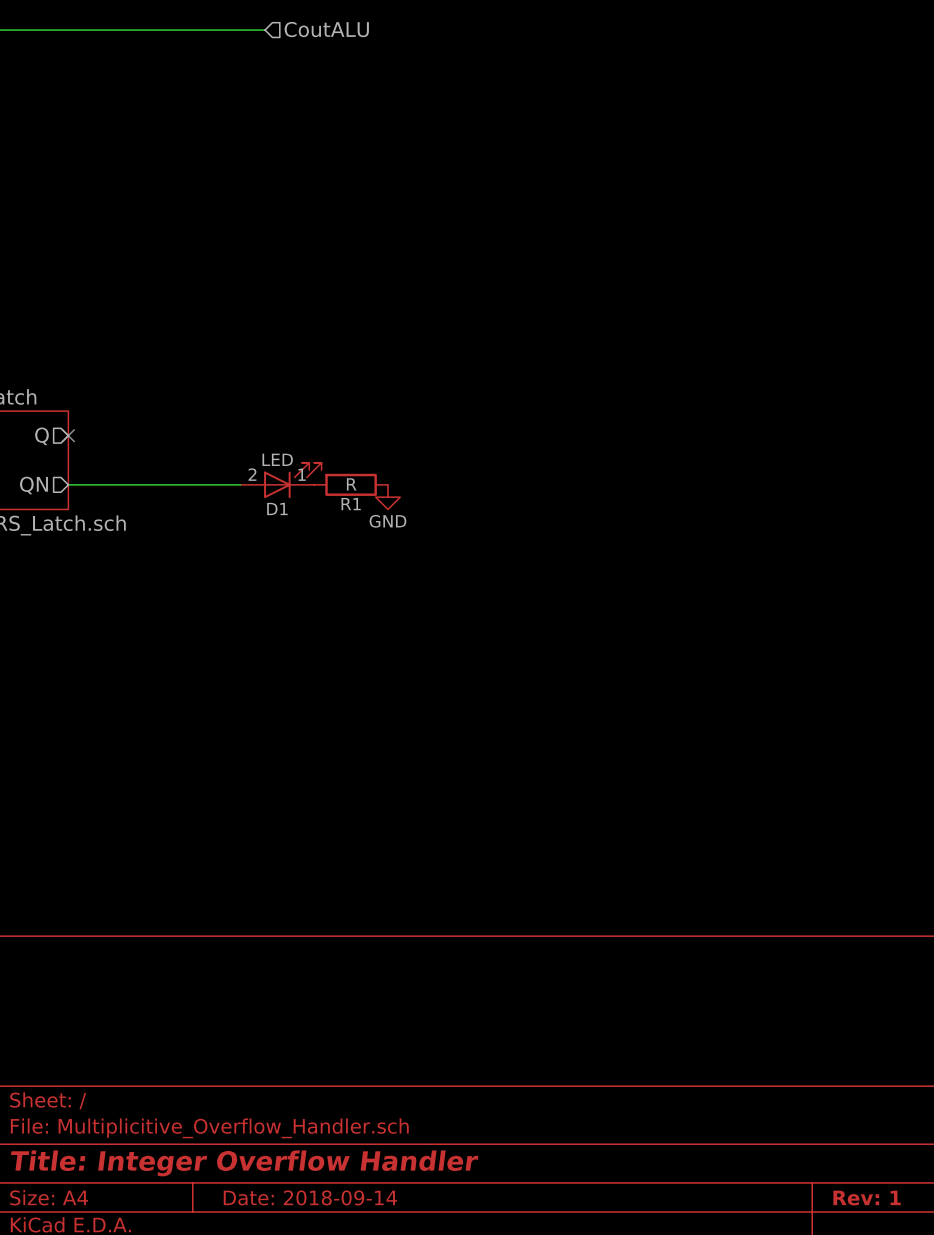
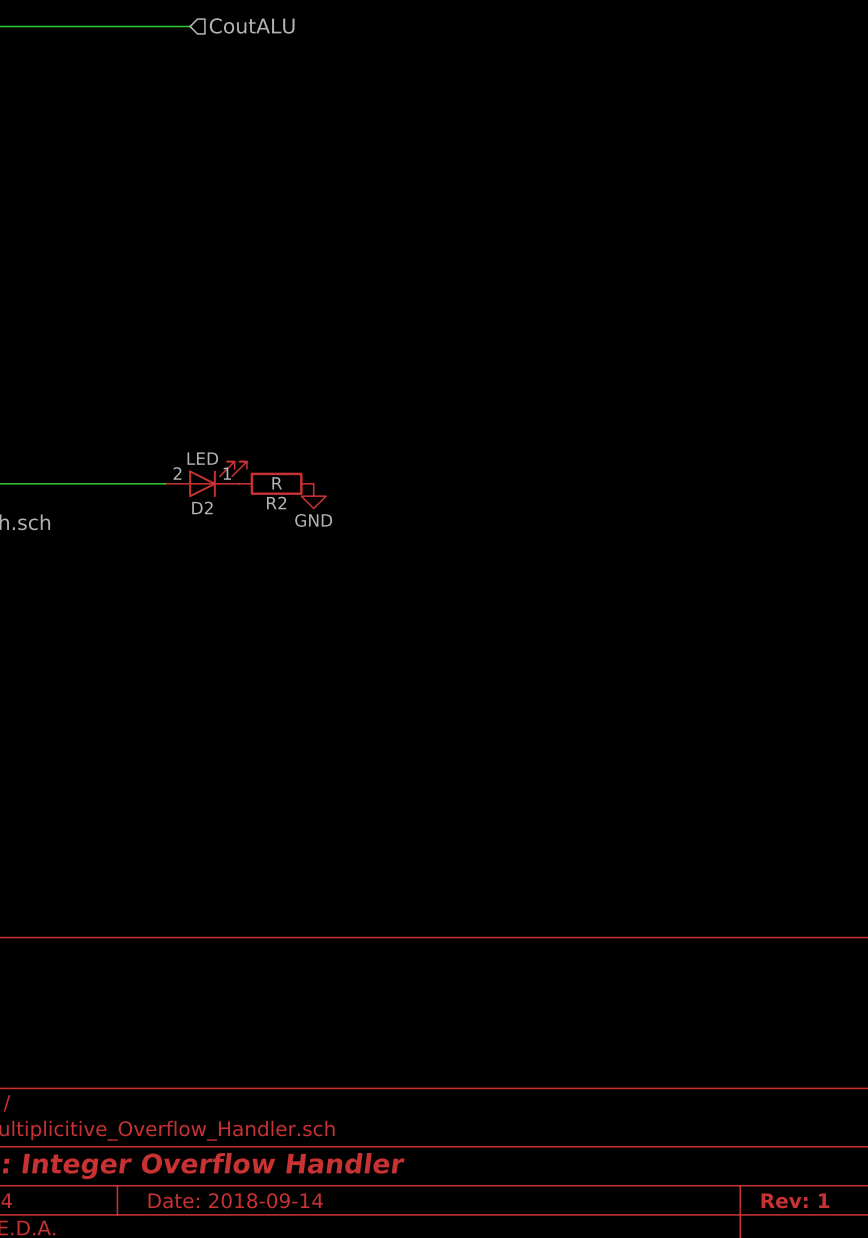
R1 name: R1 (351, 504) -> R2 (276, 503)
D1 name: D1 (277, 508) -> D2 (202, 507)

